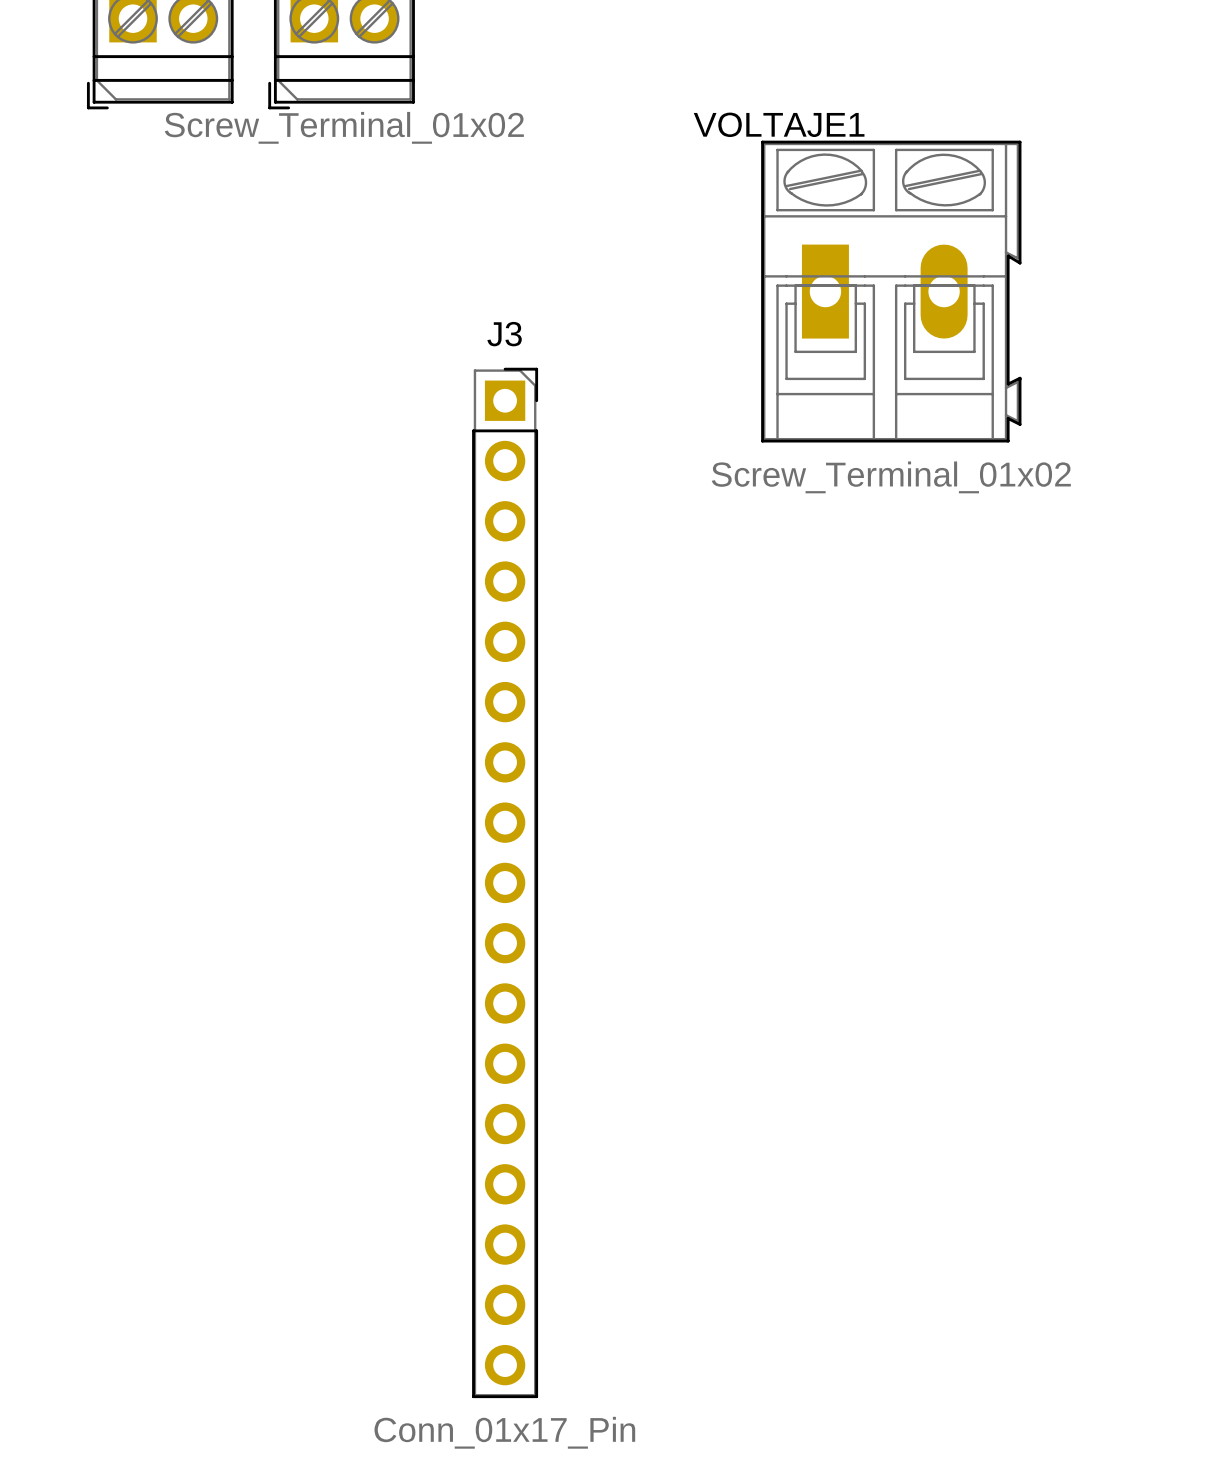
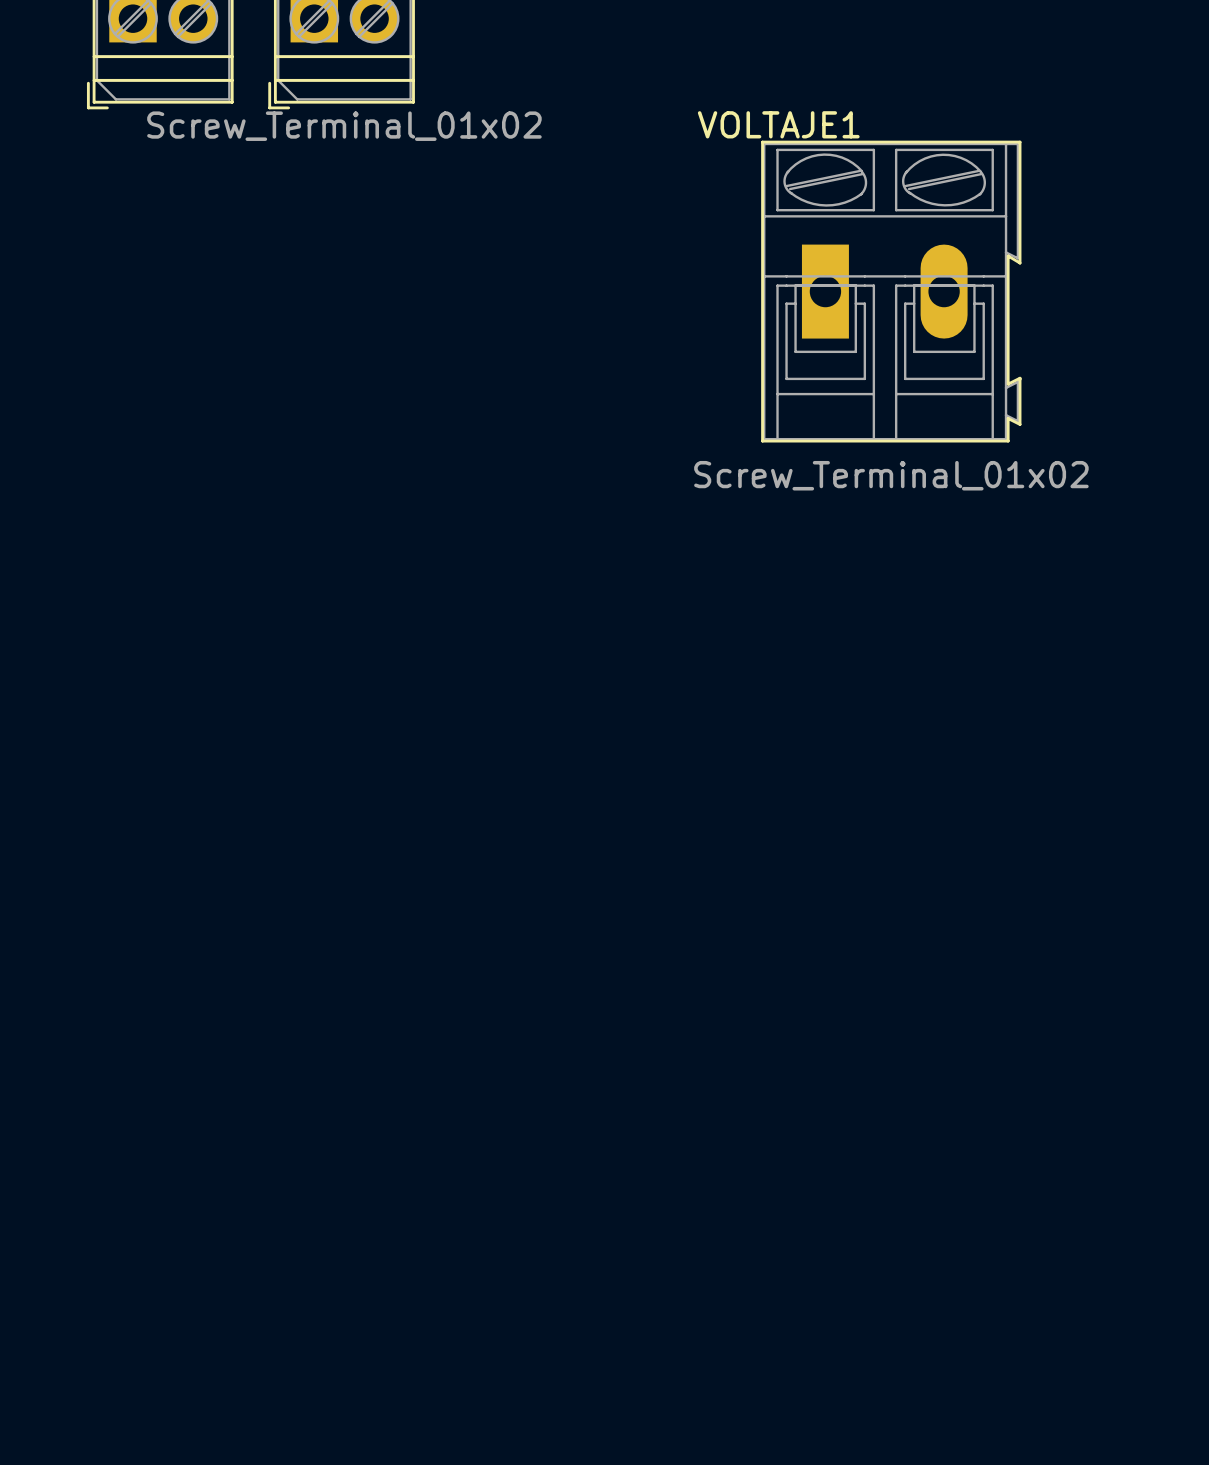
J3: Conn_01x17_Pin (505, 882) -> none

